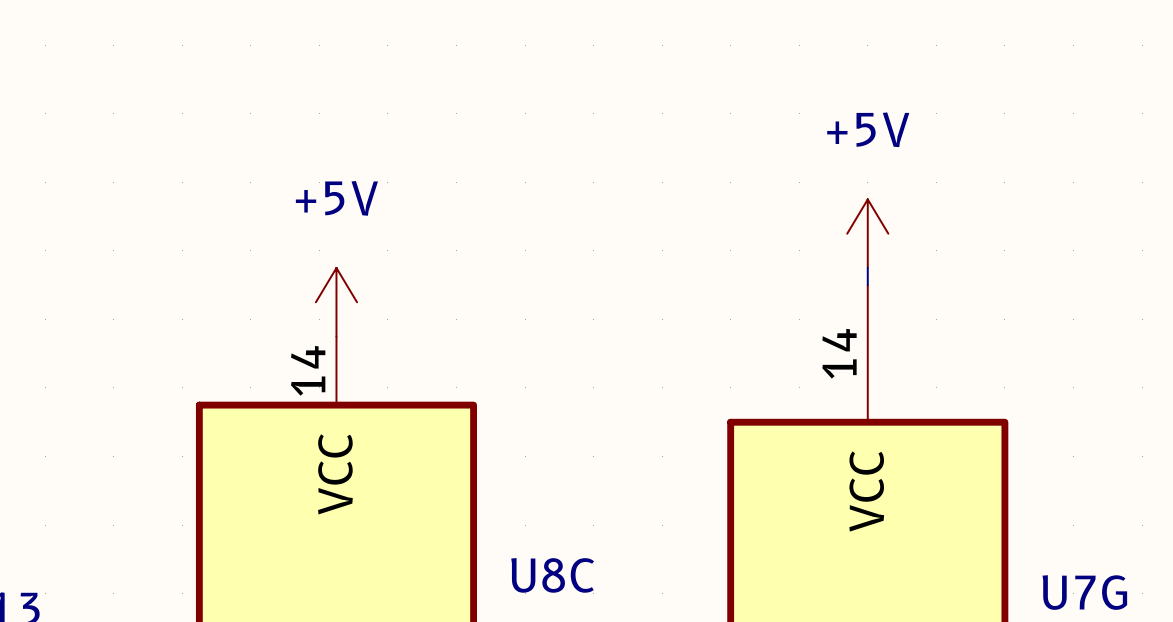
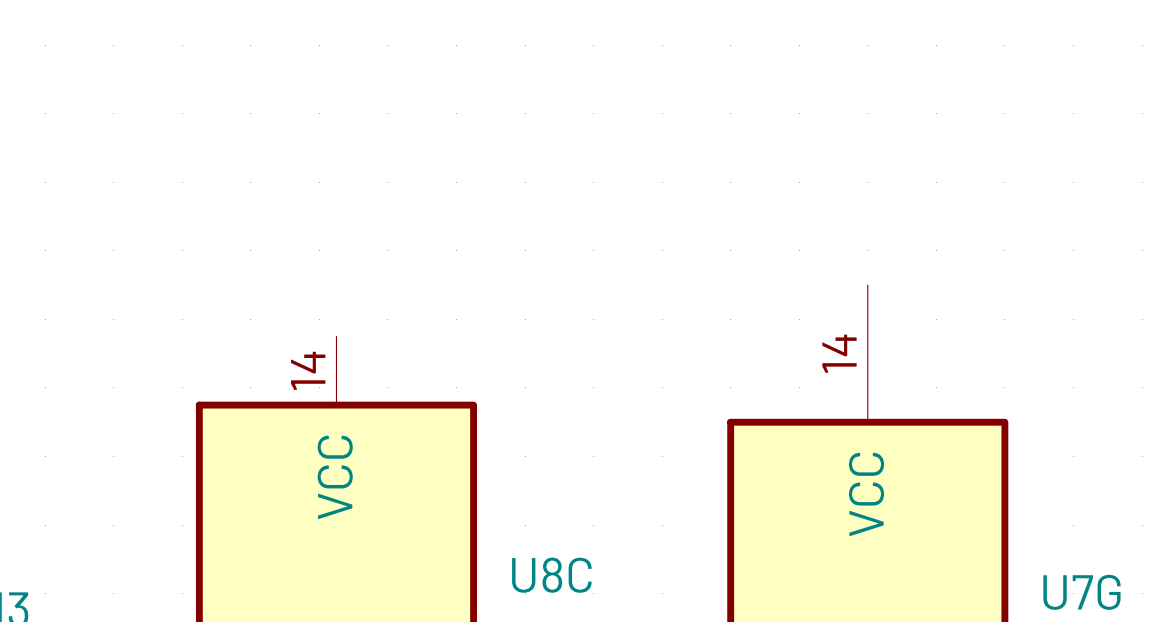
power symbol: +5V (867, 233) -> none
wire: (867, 267) (867, 285) -> none
power symbol: +5V (336, 302) -> none

